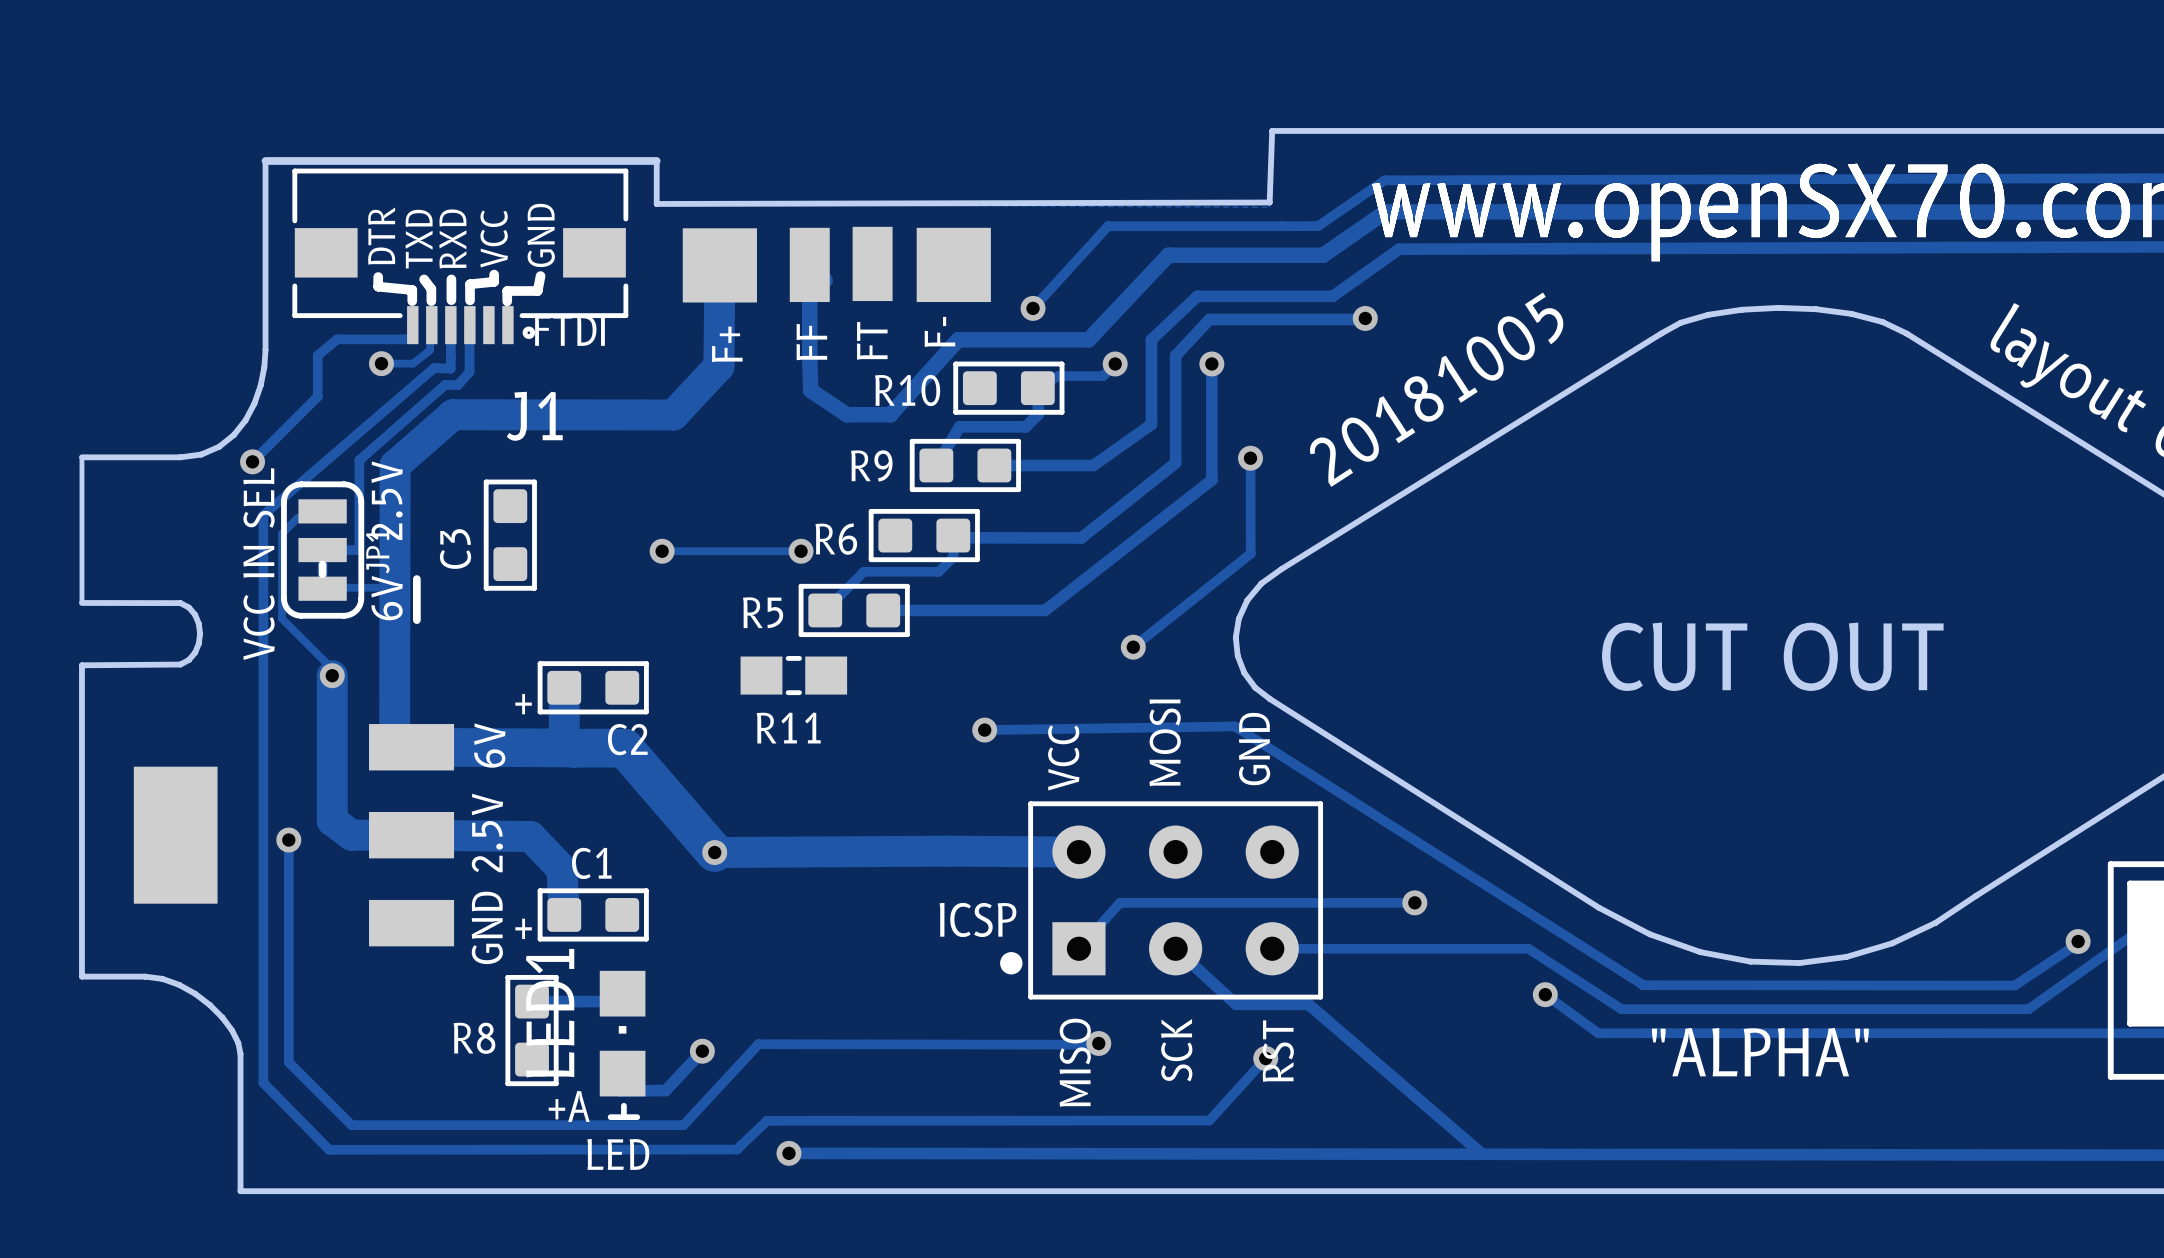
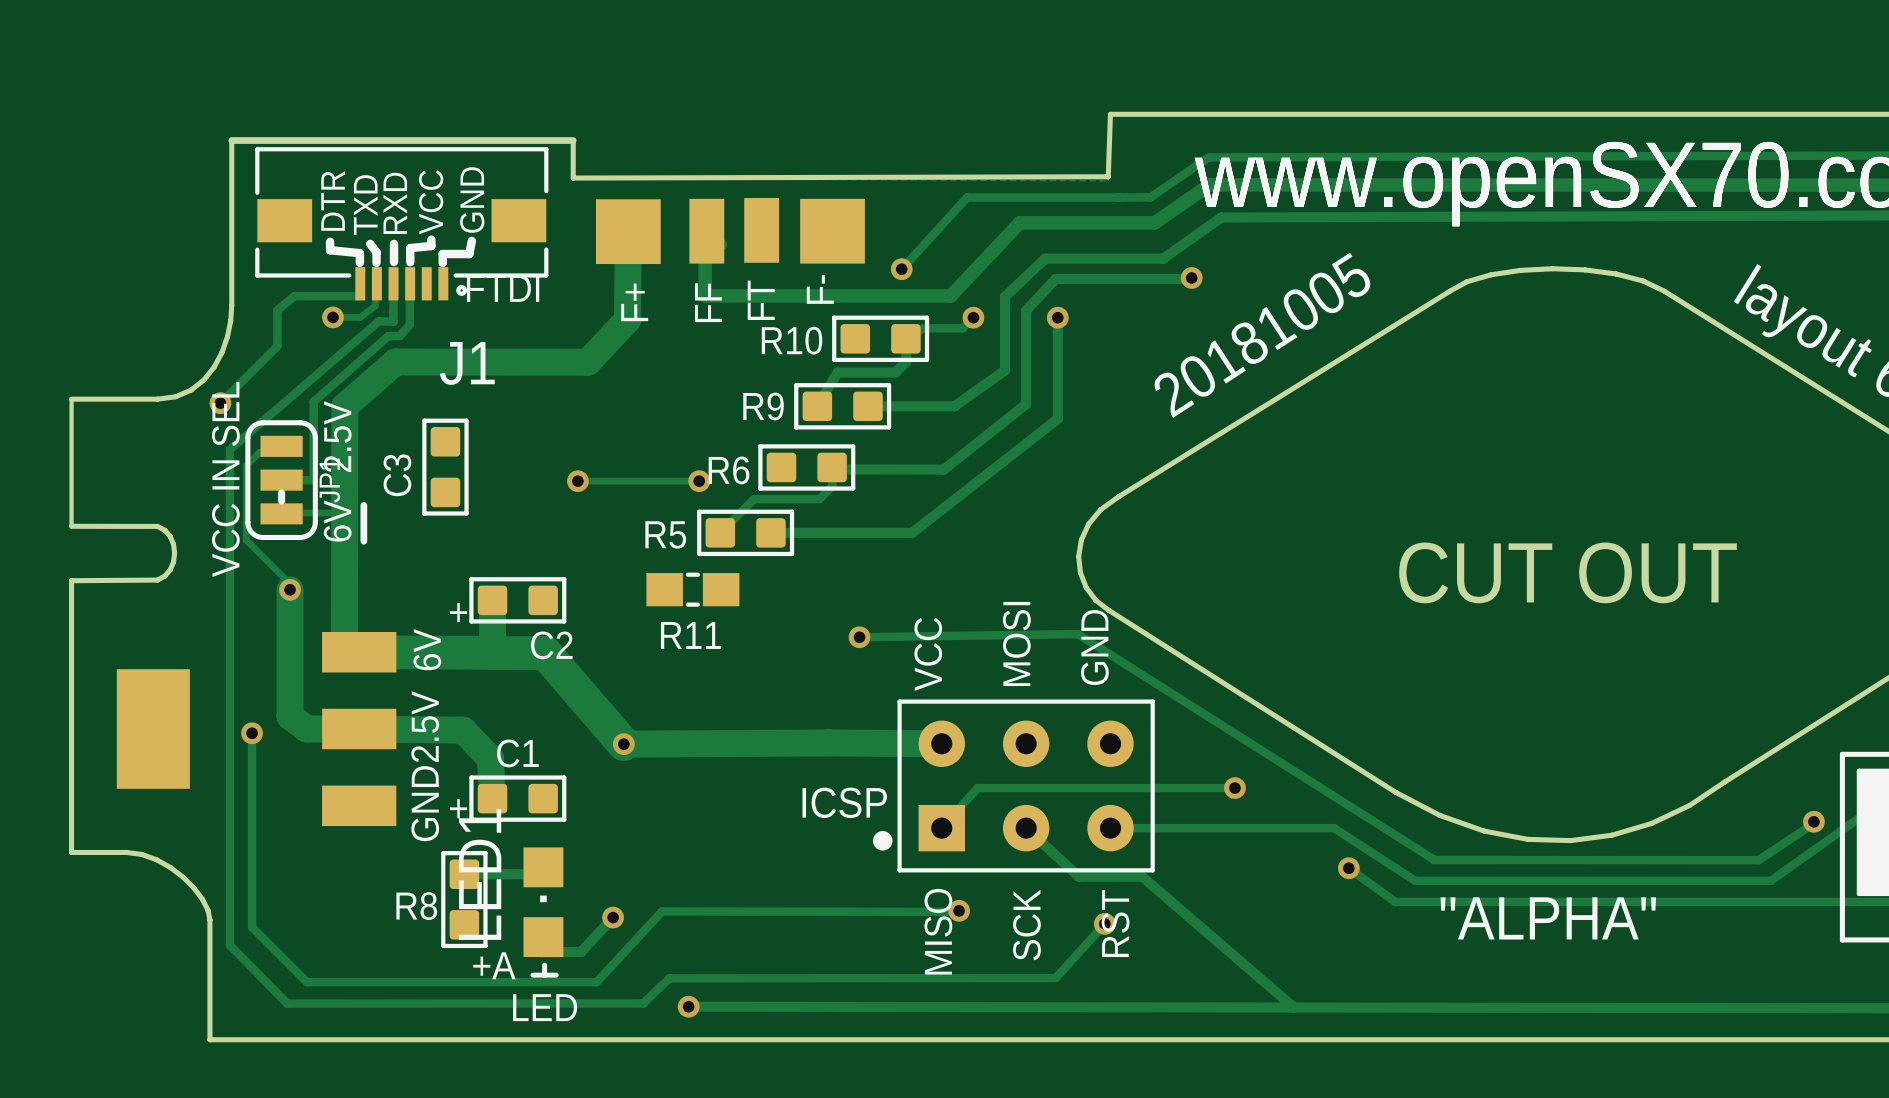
track: (809, 264) (810, 390) (846, 414) (890, 414) (958, 339) (1089, 339) -> (706, 231) (705, 232) (705, 295) (950, 295)
track: (1250, 458) (1250, 553) (1133, 647) -> none
via: (1250, 458) -> none
via: (1133, 647) -> none

